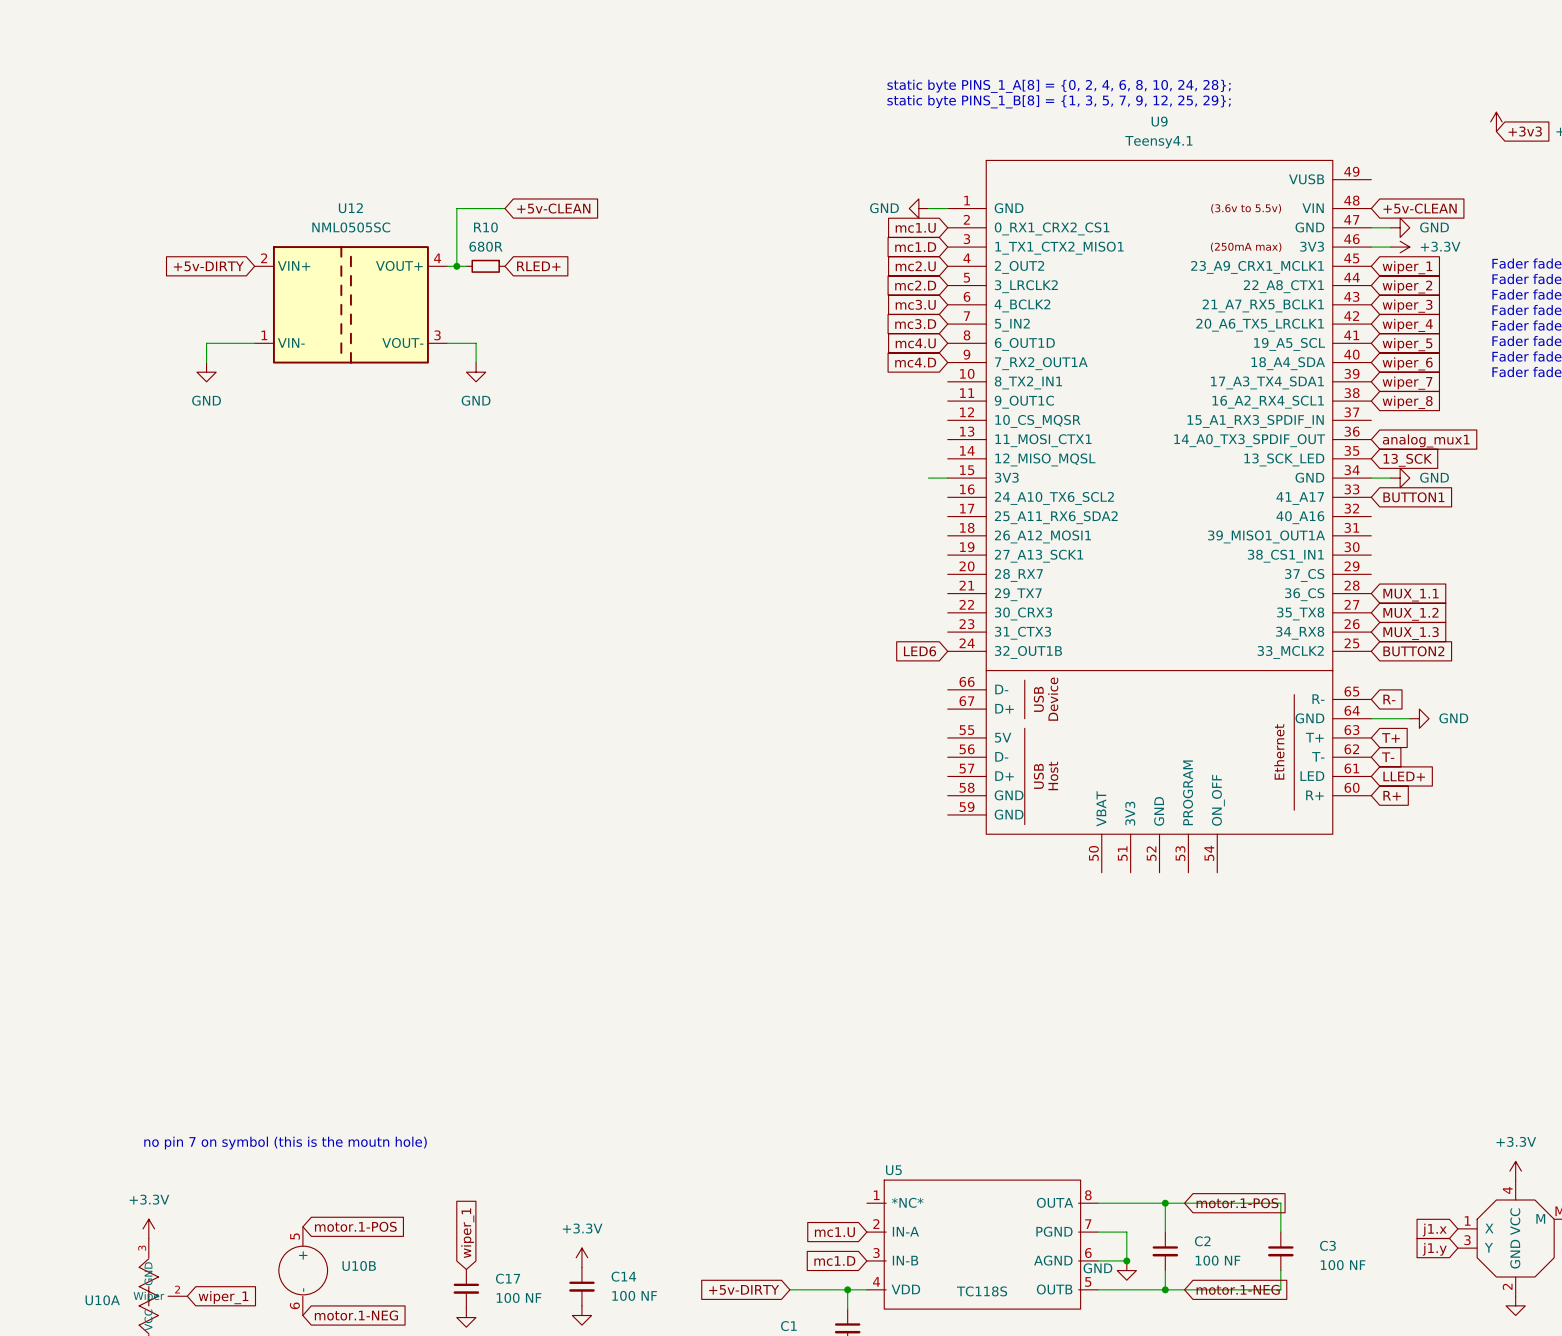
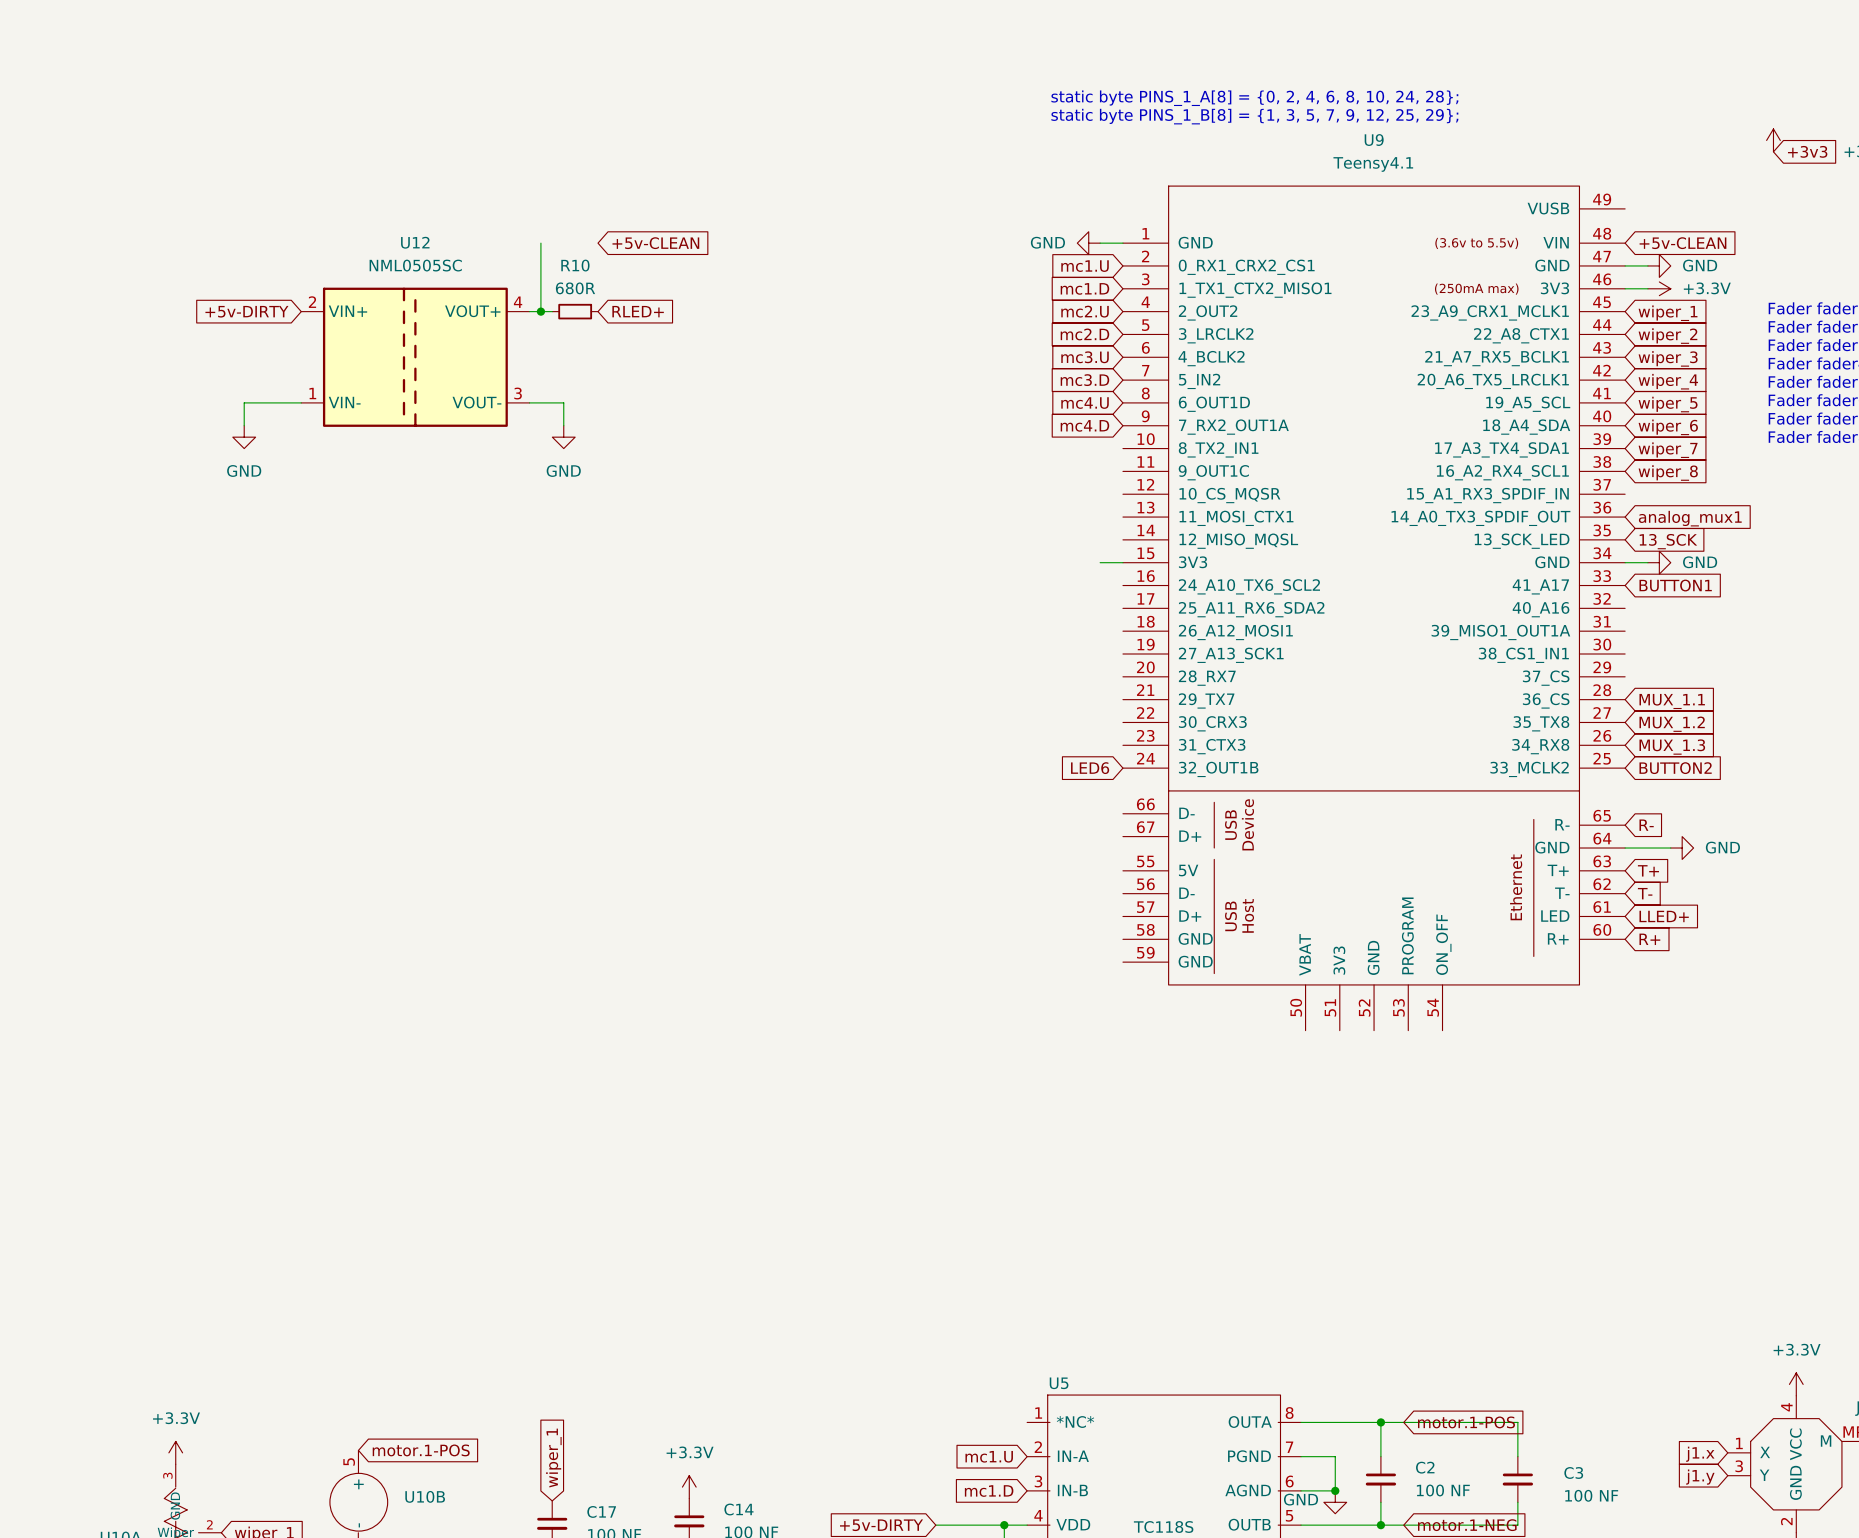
wire: (456, 208) (504, 208) -> none
text: no pin 7 on symbol (this is the moutn hole) (285, 1143) -> none

